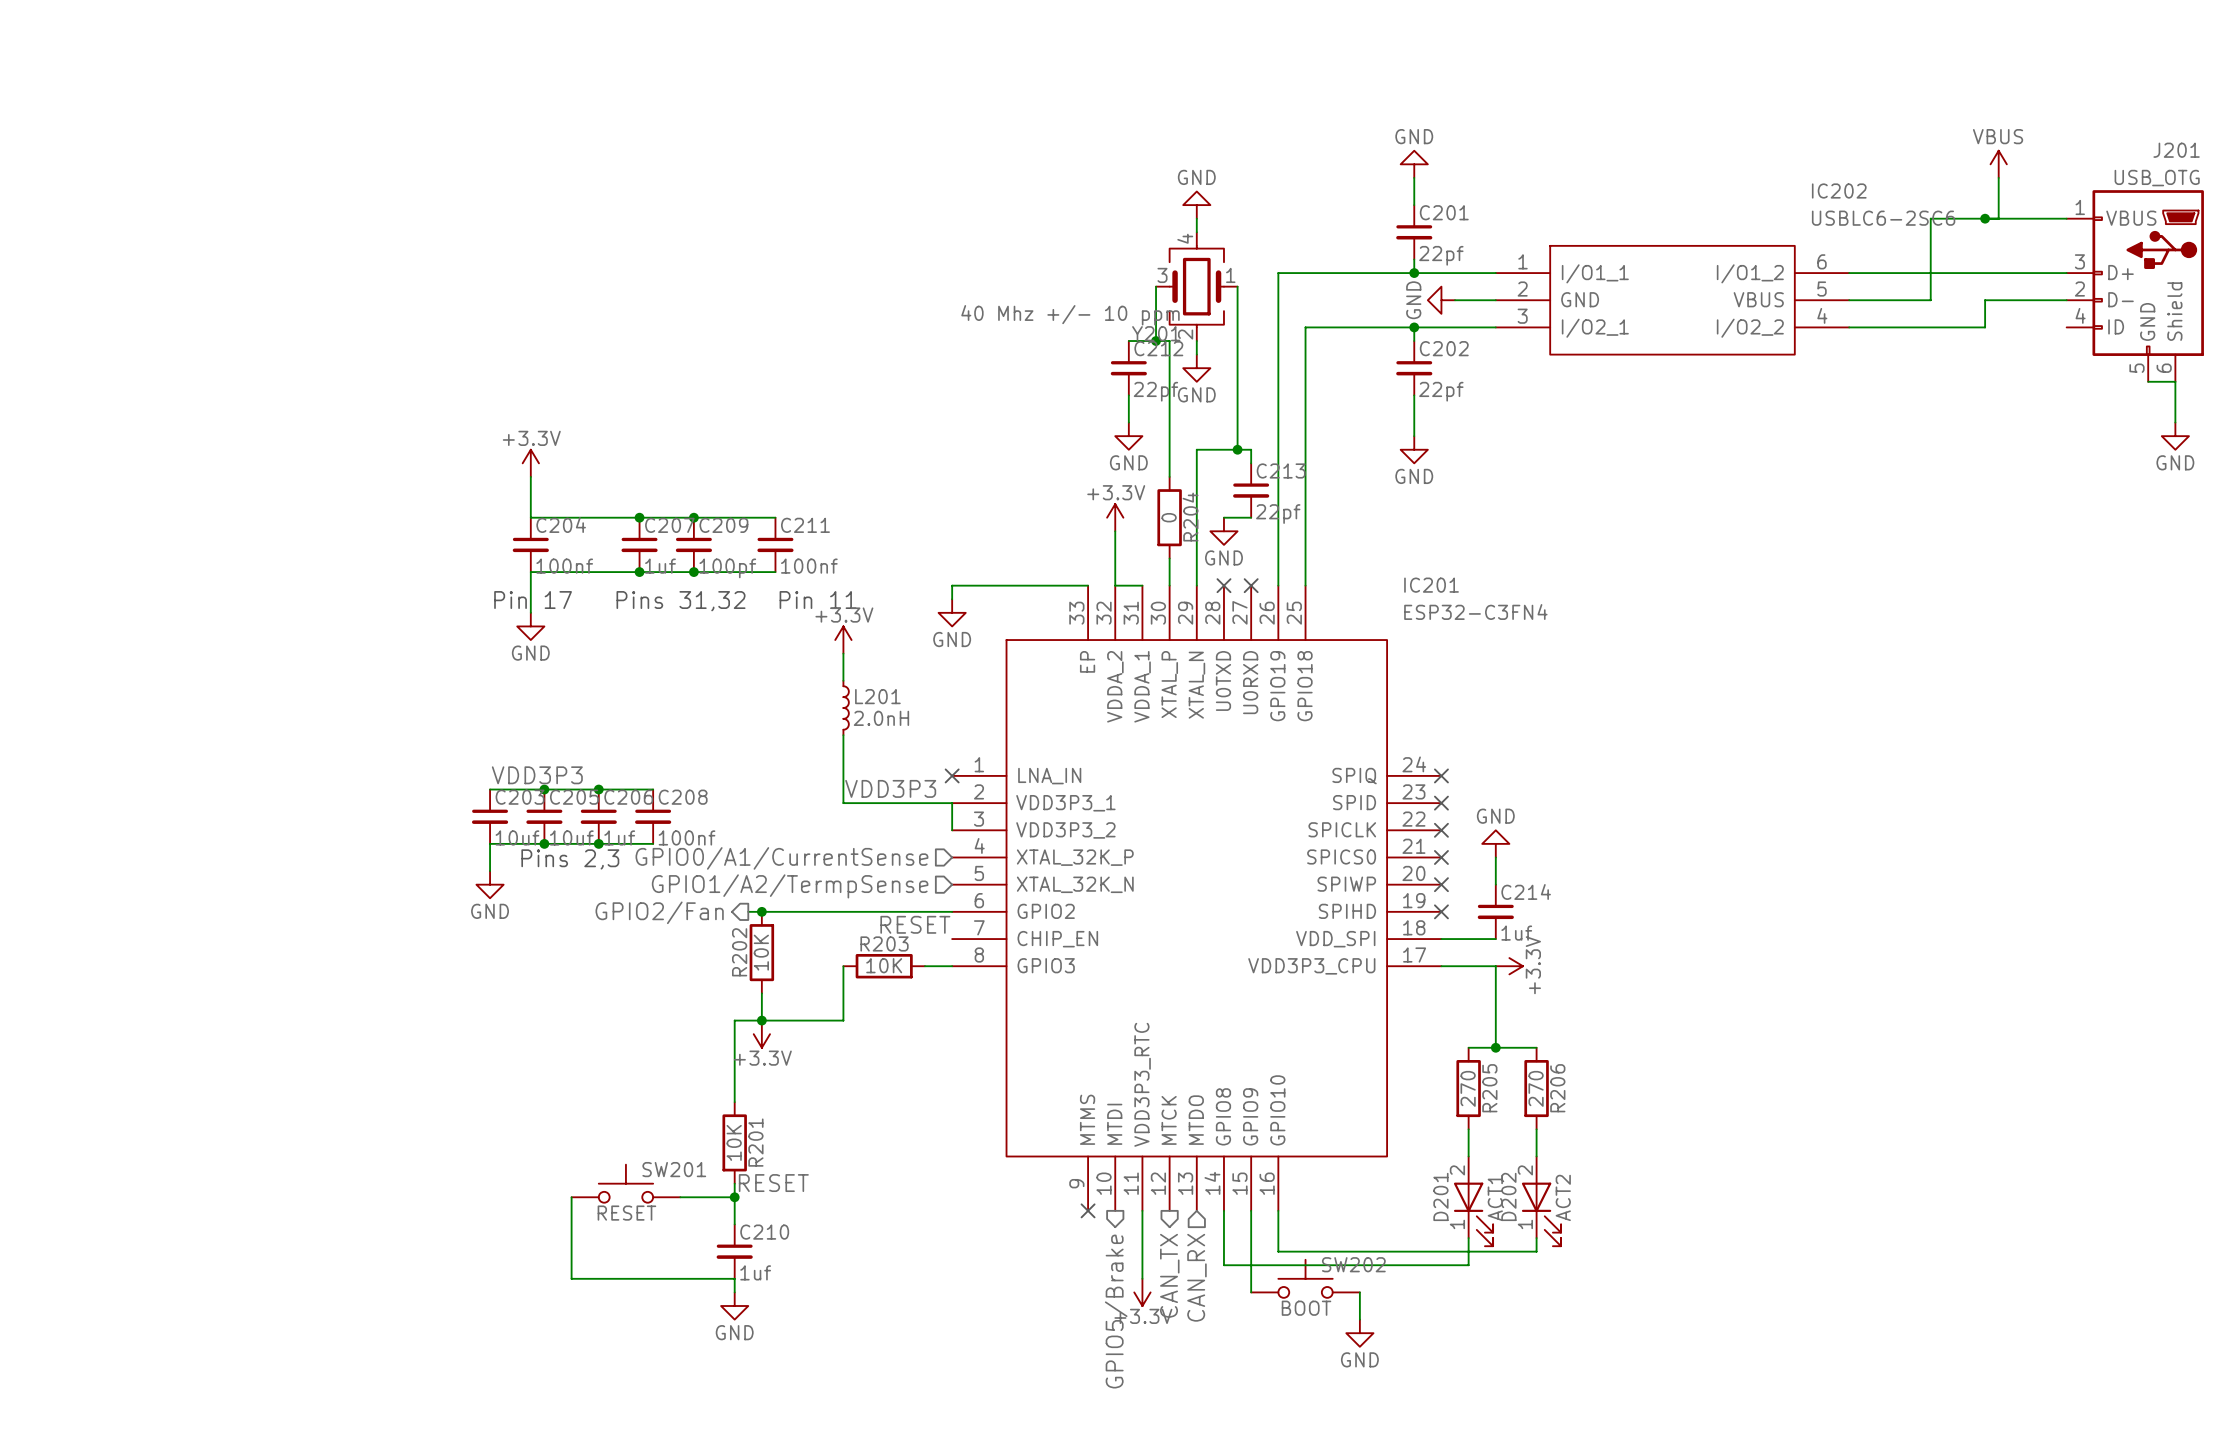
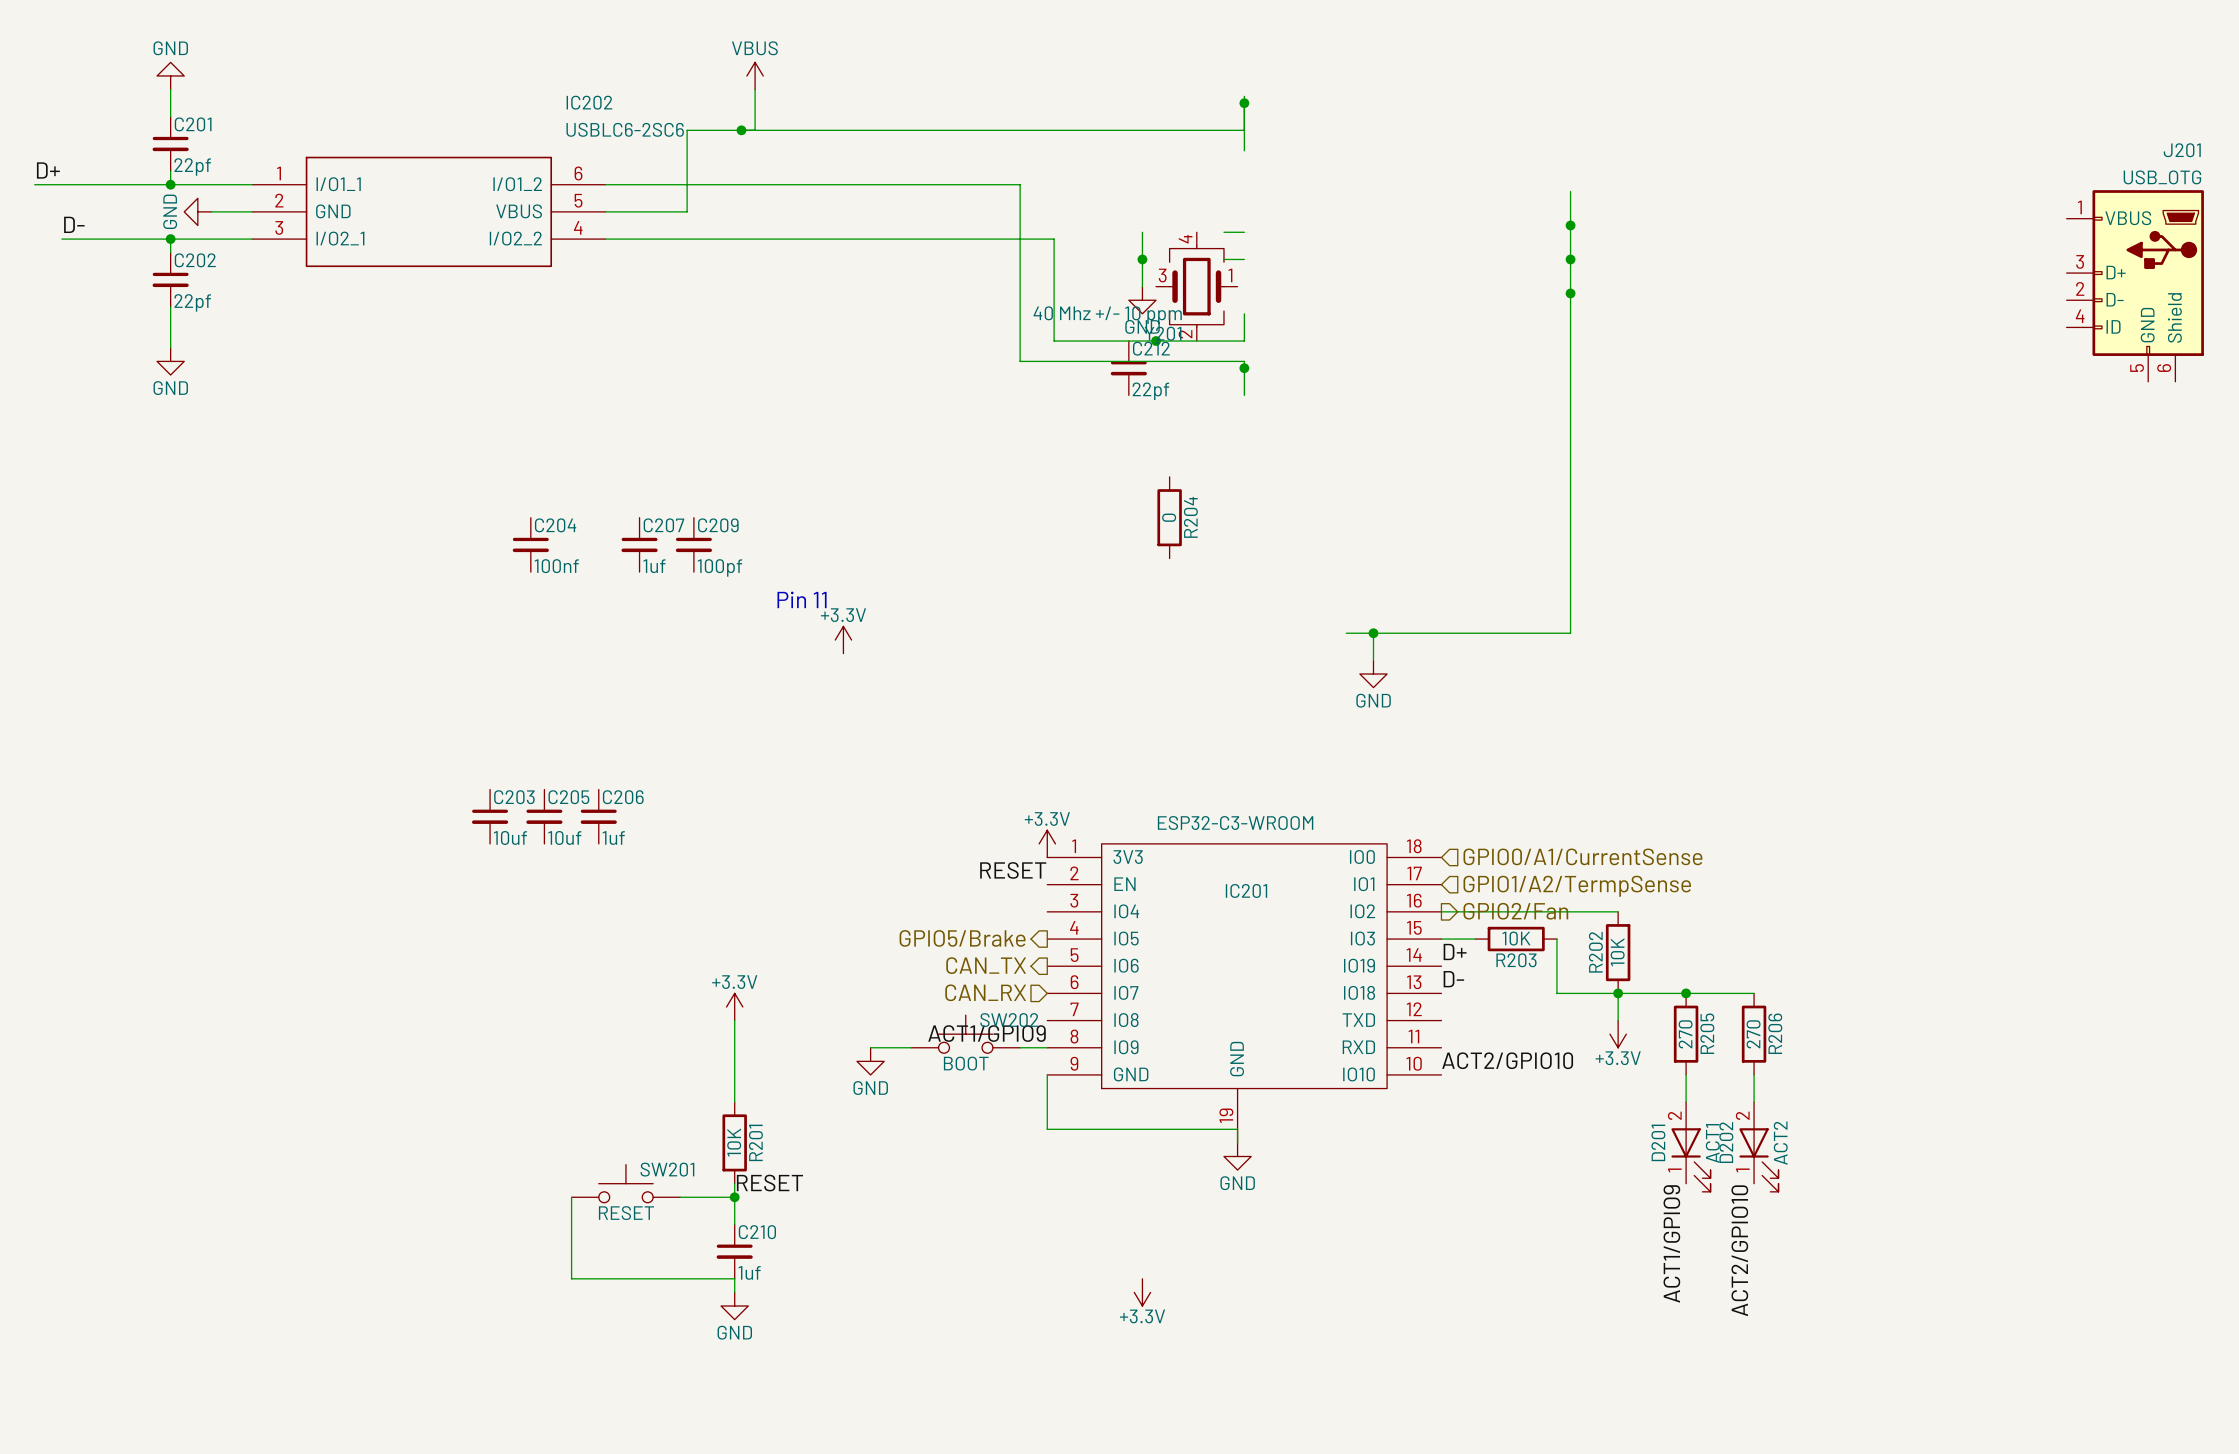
power symbol: none -> GND (170, 75)
power symbol: none -> VBUS (755, 75)
wire: none -> (170, 89) (170, 116)
wire: none -> (755, 89) (755, 130)
wire: none -> (1244, 96) (1244, 150)
junction: none -> (1244, 103)
junction: none -> (741, 130)
wire: none -> (1244, 130) (687, 130) (687, 211) (605, 211)
power symbol: GND (1414, 164) -> none
power symbol: VBUS (1998, 164) -> none
label: none -> D+ (48, 170)
wire: none -> (170, 171) (170, 184)
wire: (1414, 177) (1414, 205) -> none
wire: (1998, 177) (1998, 218) -> none
wire: none -> (34, 184) (252, 184)
junction: none -> (170, 184)
wire: none -> (605, 184) (1020, 184) (1020, 361) (1244, 361) (1244, 395)
wire: none -> (1570, 191) (1570, 633) (1346, 633)
power symbol: GND (1196, 205) -> none
power symbol: none -> GND (197, 211)
wire: none -> (211, 211) (252, 211)
wire: (1196, 218) (1196, 232) -> none
junction: (1985, 218) -> none
wire: (2066, 218) (1930, 218) (1930, 300) (1849, 300) -> none
label: none -> D- (74, 224)
junction: none -> (1570, 225)
wire: none -> (1223, 232) (1244, 232)
C201 position: (1414, 232) -> (170, 143)
wire: none -> (61, 239) (252, 239)
wire: none -> (170, 239) (170, 252)
junction: none -> (170, 239)
wire: none -> (605, 239) (1054, 239) (1054, 341) (1128, 341)
junction: none -> (1142, 259)
wire: none -> (1223, 259) (1244, 259)
wire: (1414, 259) (1414, 273) -> none
junction: none -> (1570, 259)
junction: (1414, 273) -> none
wire: (1495, 273) (1278, 273) (1278, 585) -> none
wire: (1849, 273) (2066, 273) -> none
wire: (1156, 286) (1156, 341) -> (1142, 232) (1142, 286)
wire: (1237, 286) (1237, 449) -> none
junction: none -> (1570, 293)
power symbol: none -> GND (1142, 300)
power symbol: GND (1441, 300) -> none
wire: (1455, 300) (1495, 300) -> none
IC202 position: (1672, 300) -> (428, 211)
wire: (2066, 300) (1985, 300) (1985, 327) (1849, 327) -> none
wire: none -> (170, 307) (170, 347)
wire: (1414, 327) (1414, 341) -> none
junction: (1414, 327) -> none
wire: (1495, 327) (1305, 327) (1305, 585) -> none
wire: (1169, 341) (1169, 476) -> (1169, 341) (1244, 341) (1244, 313)
wire: (1196, 341) (1196, 354) -> none
power symbol: none -> GND (170, 361)
power symbol: GND (1196, 368) -> none
junction: none -> (1244, 368)
C202 position: (1414, 368) -> (170, 279)
wire: (2148, 381) (2175, 381) (2175, 422) -> none
wire: (1128, 395) (1128, 422) -> none
wire: (1414, 395) (1414, 436) -> none
power symbol: GND (1128, 436) -> none
power symbol: GND (2175, 436) -> none
junction: (1237, 449) -> none
power symbol: GND (1414, 449) -> none
power symbol: +3.3V (530, 463) -> none
wire: (1251, 463) (1251, 449) (1196, 449) (1196, 585) -> none
wire: (530, 476) (530, 517) (775, 517) -> none
C213: 22pf (1251, 490) -> none
junction: (639, 517) -> none
junction: (693, 517) -> none
power symbol: +3.3V (1115, 517) -> none
wire: (1223, 517) (1251, 517) -> none
wire: (1115, 531) (1115, 585) (1142, 585) -> none
power symbol: GND (1223, 531) -> none
C211: 100nf (775, 544) -> none
wire: (1169, 558) (1169, 585) -> (1373, 633) (1373, 660)
junction: (639, 572) -> none
junction: (693, 572) -> none
wire: (775, 572) (530, 572) (530, 612) -> none
IC201 symbol: [952, 585, 1442, 1211] -> [1047, 843, 1442, 1143]
wire: (1088, 585) (952, 585) (952, 599) -> none
no-connect mark: (1223, 585) -> none
no-connect mark: (1251, 585) -> none
IC201 name position: IC201 (1431, 585) -> IC201 (1246, 890)
text: Pin 17 (533, 600) -> none
text: Pins 31,32 (681, 601) -> none
power symbol: GND (952, 612) -> none
IC201 value: ESP32-C3FN4 (1475, 612) -> ESP32-C3-WROOM (1235, 823)
power symbol: GND (530, 626) -> none
junction: none -> (1373, 633)
wire: (843, 653) (843, 680) -> none
power symbol: none -> GND (1373, 674)
L201: 2.0nH (846, 707) -> none
wire: (843, 735) (843, 803) (952, 803) (952, 830) -> none
label: VDD3P3 (537, 775) -> none
no-connect mark: (952, 775) -> none
no-connect mark: (1441, 775) -> none
label: VDD3P3 (890, 788) -> none
wire: (490, 789) (653, 789) -> none
junction: (544, 789) -> none
junction: (598, 789) -> none
no-connect mark: (1441, 803) -> none
C208: 100nf (653, 816) -> none
no-connect mark: (1441, 830) -> none
junction: (544, 843) -> none
junction: (598, 843) -> none
wire: (653, 843) (490, 843) (490, 871) -> none
power symbol: none -> +3.3V (1047, 843)
power symbol: GND (1495, 843) -> none
no-connect mark: (1441, 857) -> none
wire: (1495, 857) (1495, 884) -> (1618, 993) (1618, 1020)
hierarchical label: GPIO0/A1/CurrentSense (781, 858) -> none
hierarchical label: none -> GPIO0/A1/CurrentSense (1582, 856)
text: Pins 2,3 (570, 859) -> none
power symbol: GND (490, 884) -> none
no-connect mark: (1441, 884) -> none
hierarchical label: GPIO1/A2/TermpSense (790, 886) -> none
hierarchical label: none -> GPIO1/A2/TermpSense (1577, 886)
wire: (748, 911) (952, 911) -> none
junction: (761, 911) -> none
wire: none -> (1441, 911) (1618, 911)
no-connect mark: (1441, 911) -> none
C214: 1uf (1495, 911) -> none
hierarchical label: GPIO2/Fan (659, 912) -> none
hierarchical label: none -> GPIO2/Fan (1515, 911)
label position: RESET (915, 924) -> RESET (1013, 870)
hierarchical label: none -> GPIO5/Brake (962, 938)
wire: none -> (1556, 939) (1556, 993) (1754, 993)
R203 name position: R203 (884, 943) -> R203 (1516, 960)
label: none -> D+ (1455, 951)
R202 position: (761, 952) -> (1618, 952)
wire: (843, 966) (843, 1020) (734, 1020) -> none
R203 position: (884, 966) -> (1516, 939)
wire: (924, 966) (952, 966) -> (1020, 1047) (1047, 1047)
hierarchical label: none -> CAN_TX (986, 965)
wire: (1441, 966) (1495, 966) (1495, 1047) -> none
power symbol rotation: 0° (1509, 966) -> 90° clockwise (1618, 1034)
power symbol position: +3.3V (1509, 966) -> +3.3V (1618, 1034)
label: none -> D- (1453, 979)
wire: (761, 993) (761, 1020) -> none
hierarchical label: none -> CAN_RX (985, 992)
junction: none -> (1618, 993)
junction: none -> (1686, 993)
junction: (761, 1020) -> none
power symbol rotation: 0° (761, 1034) -> 180° (734, 1006)
power symbol position: +3.3V (761, 1034) -> +3.3V (734, 1006)
label: none -> ACT1/GPIO9 (987, 1033)
wire: none -> (870, 1047) (911, 1047)
wire: (1468, 1047) (1536, 1047) -> none
junction: (1495, 1047) -> none
power symbol: none -> GND (870, 1061)
label: none -> ACT2/GPIO10 (1507, 1060)
wire: none -> (1047, 1074) (1047, 1129) (1237, 1129) (1237, 1142)
R205 position: (1468, 1088) -> (1686, 1034)
R206 position: (1536, 1088) -> (1754, 1034)
wire: (1468, 1129) (1468, 1156) -> (1686, 1074) (1686, 1102)
wire: (1536, 1129) (1536, 1156) -> (1754, 1074) (1754, 1102)
power symbol: none -> GND (1237, 1156)
D201 position: (1473, 1201) -> (1690, 1146)
D202 position: (1541, 1201) -> (1758, 1146)
no-connect mark: (1088, 1210) -> none
wire: (1142, 1210) (1142, 1278) -> none
wire: (1223, 1210) (1223, 1265) (1468, 1265) (1468, 1238) -> none
wire: (1251, 1210) (1251, 1292) -> none
wire: (1278, 1210) (1278, 1251) (1536, 1251) (1536, 1238) -> none
label: none -> ACT1/GPIO9 (1671, 1243)
label: none -> ACT2/GPIO10 (1739, 1250)
hierarchical label: CAN_TX (1169, 1275) -> none
hierarchical label: CAN_RX (1196, 1277) -> none
SW202 position: (1305, 1278) -> (965, 1034)
wire: (1359, 1292) (1359, 1319) -> none
hierarchical label: GPIO5/Brake (1116, 1311) -> none
power symbol: GND (1359, 1333) -> none

